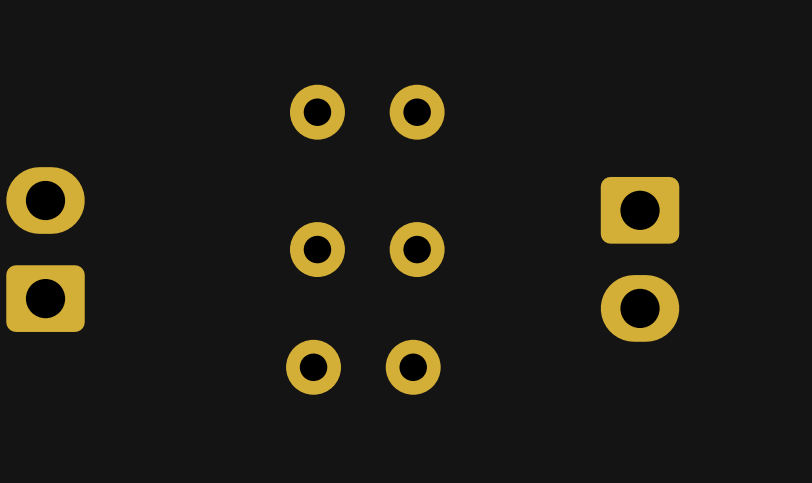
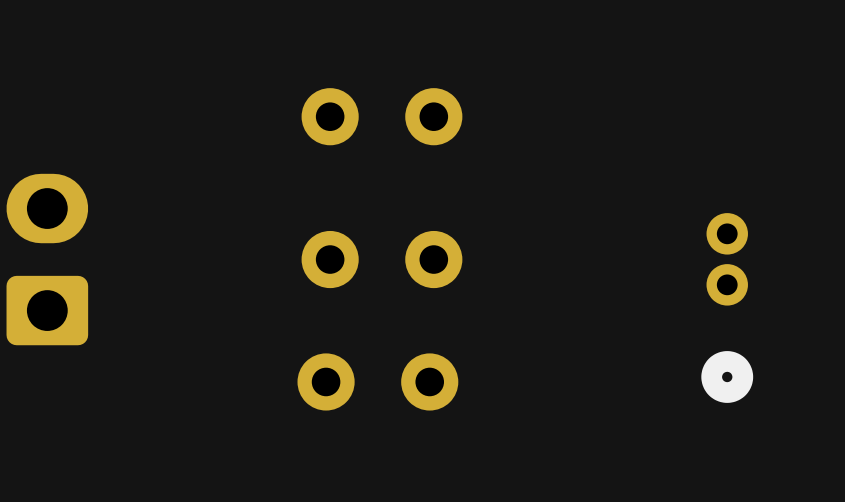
part: (640, 259) -> none
part: none -> (727, 308)

